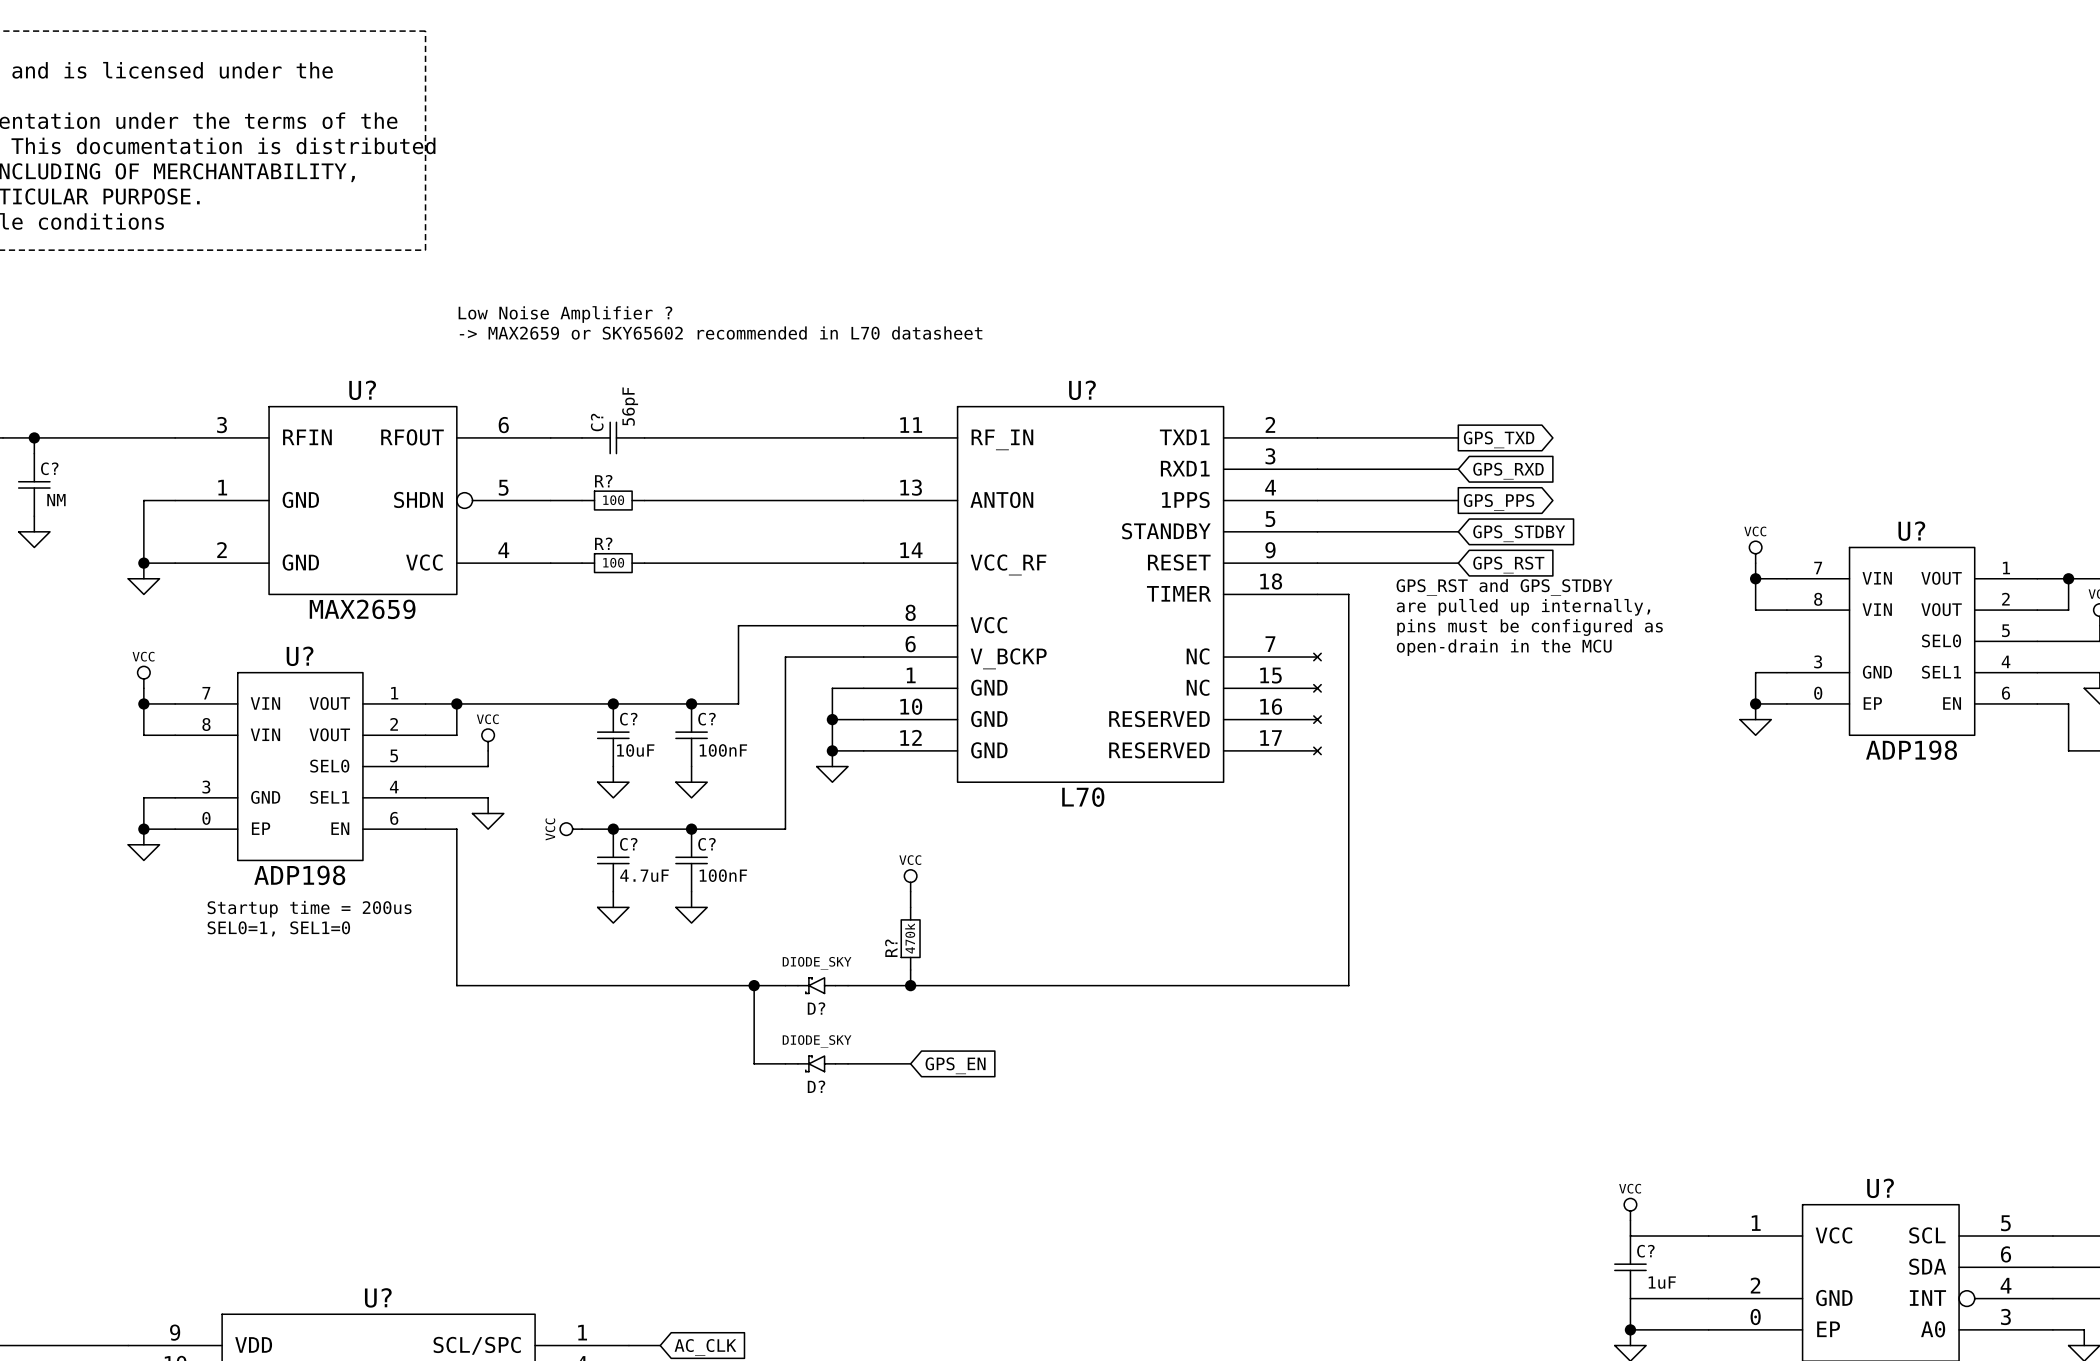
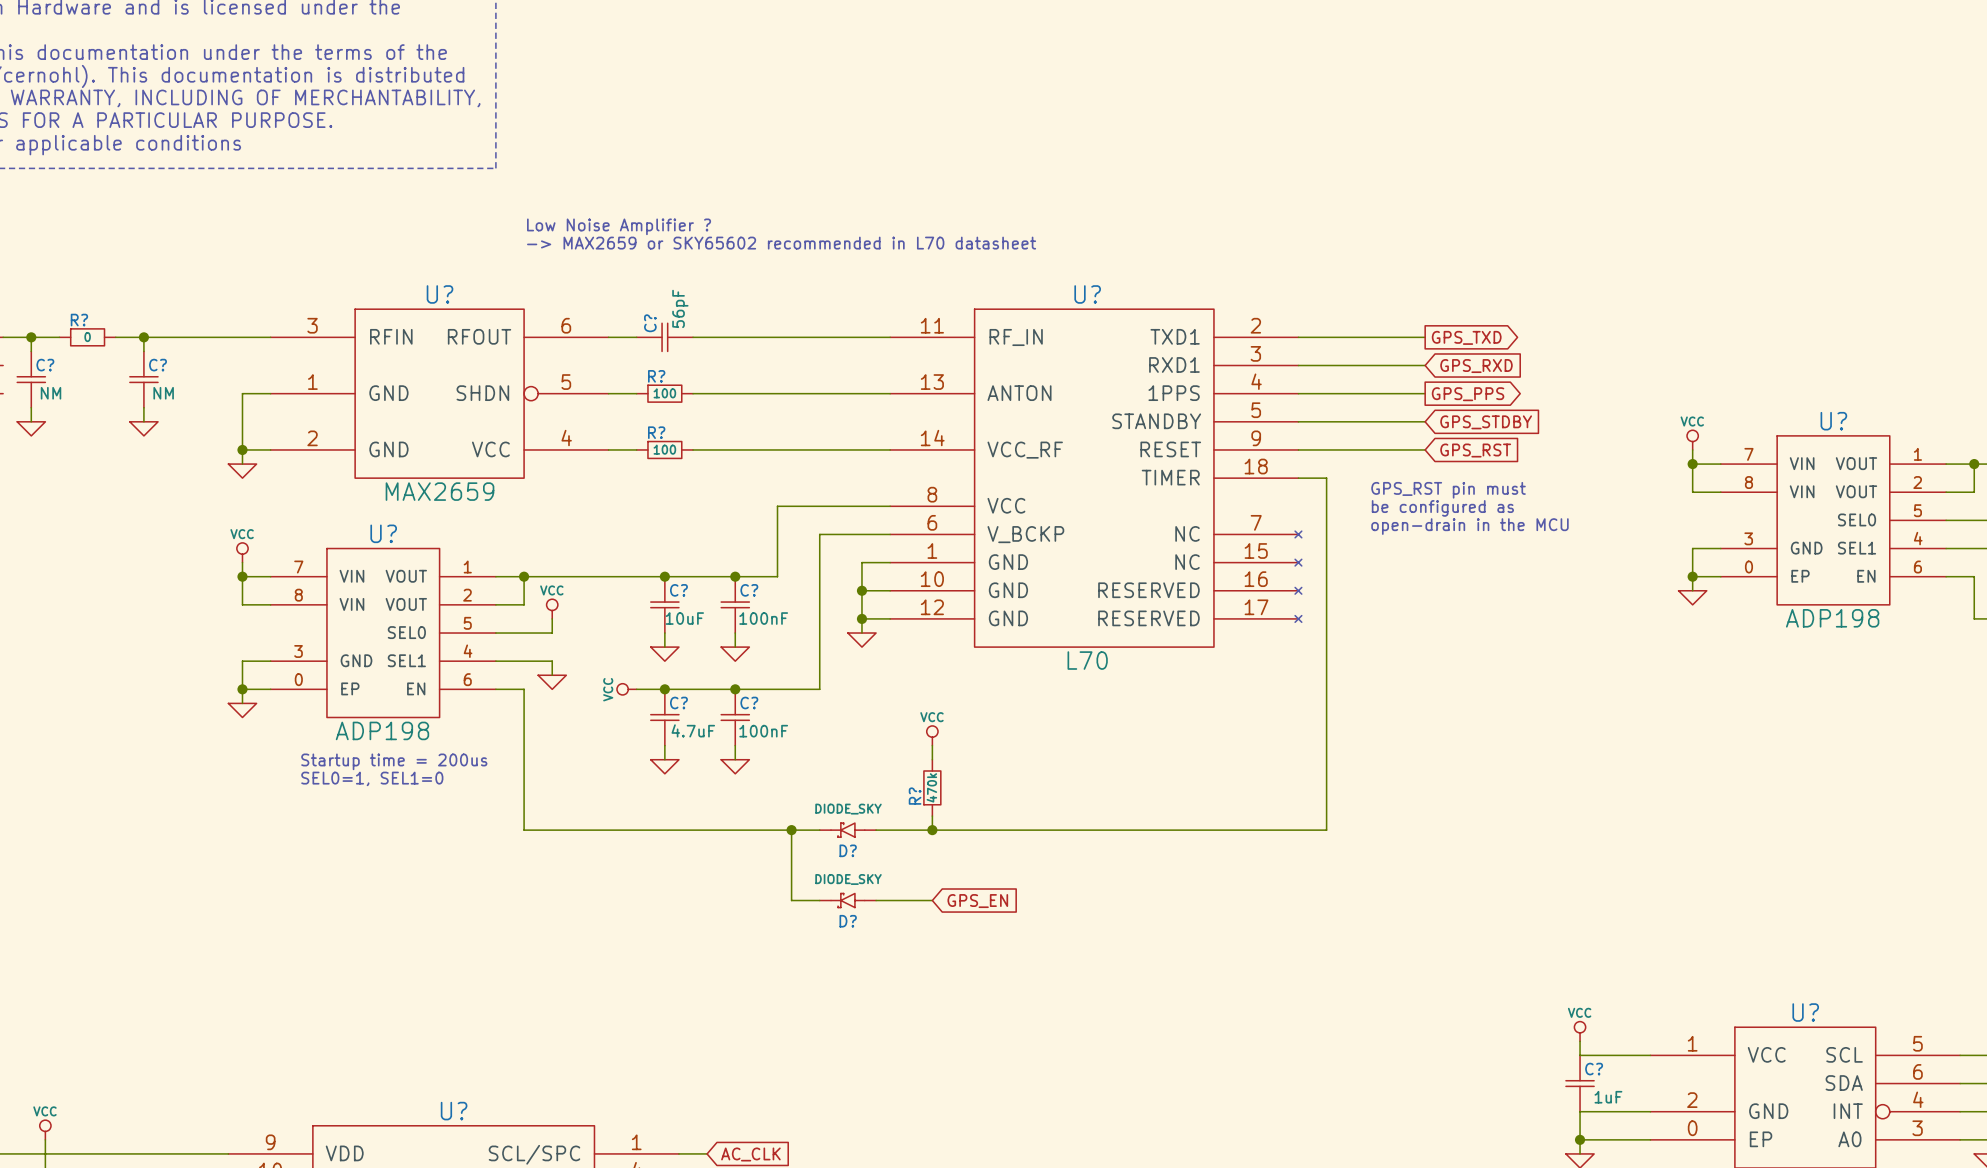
text: GPS_RST and GPS_STDBY (1504, 587) -> none
text: are pulled up internally, (1523, 607) -> GPS_RST pin must (1448, 490)
text: pins must be configured as (1530, 627) -> be configured as (1442, 508)

